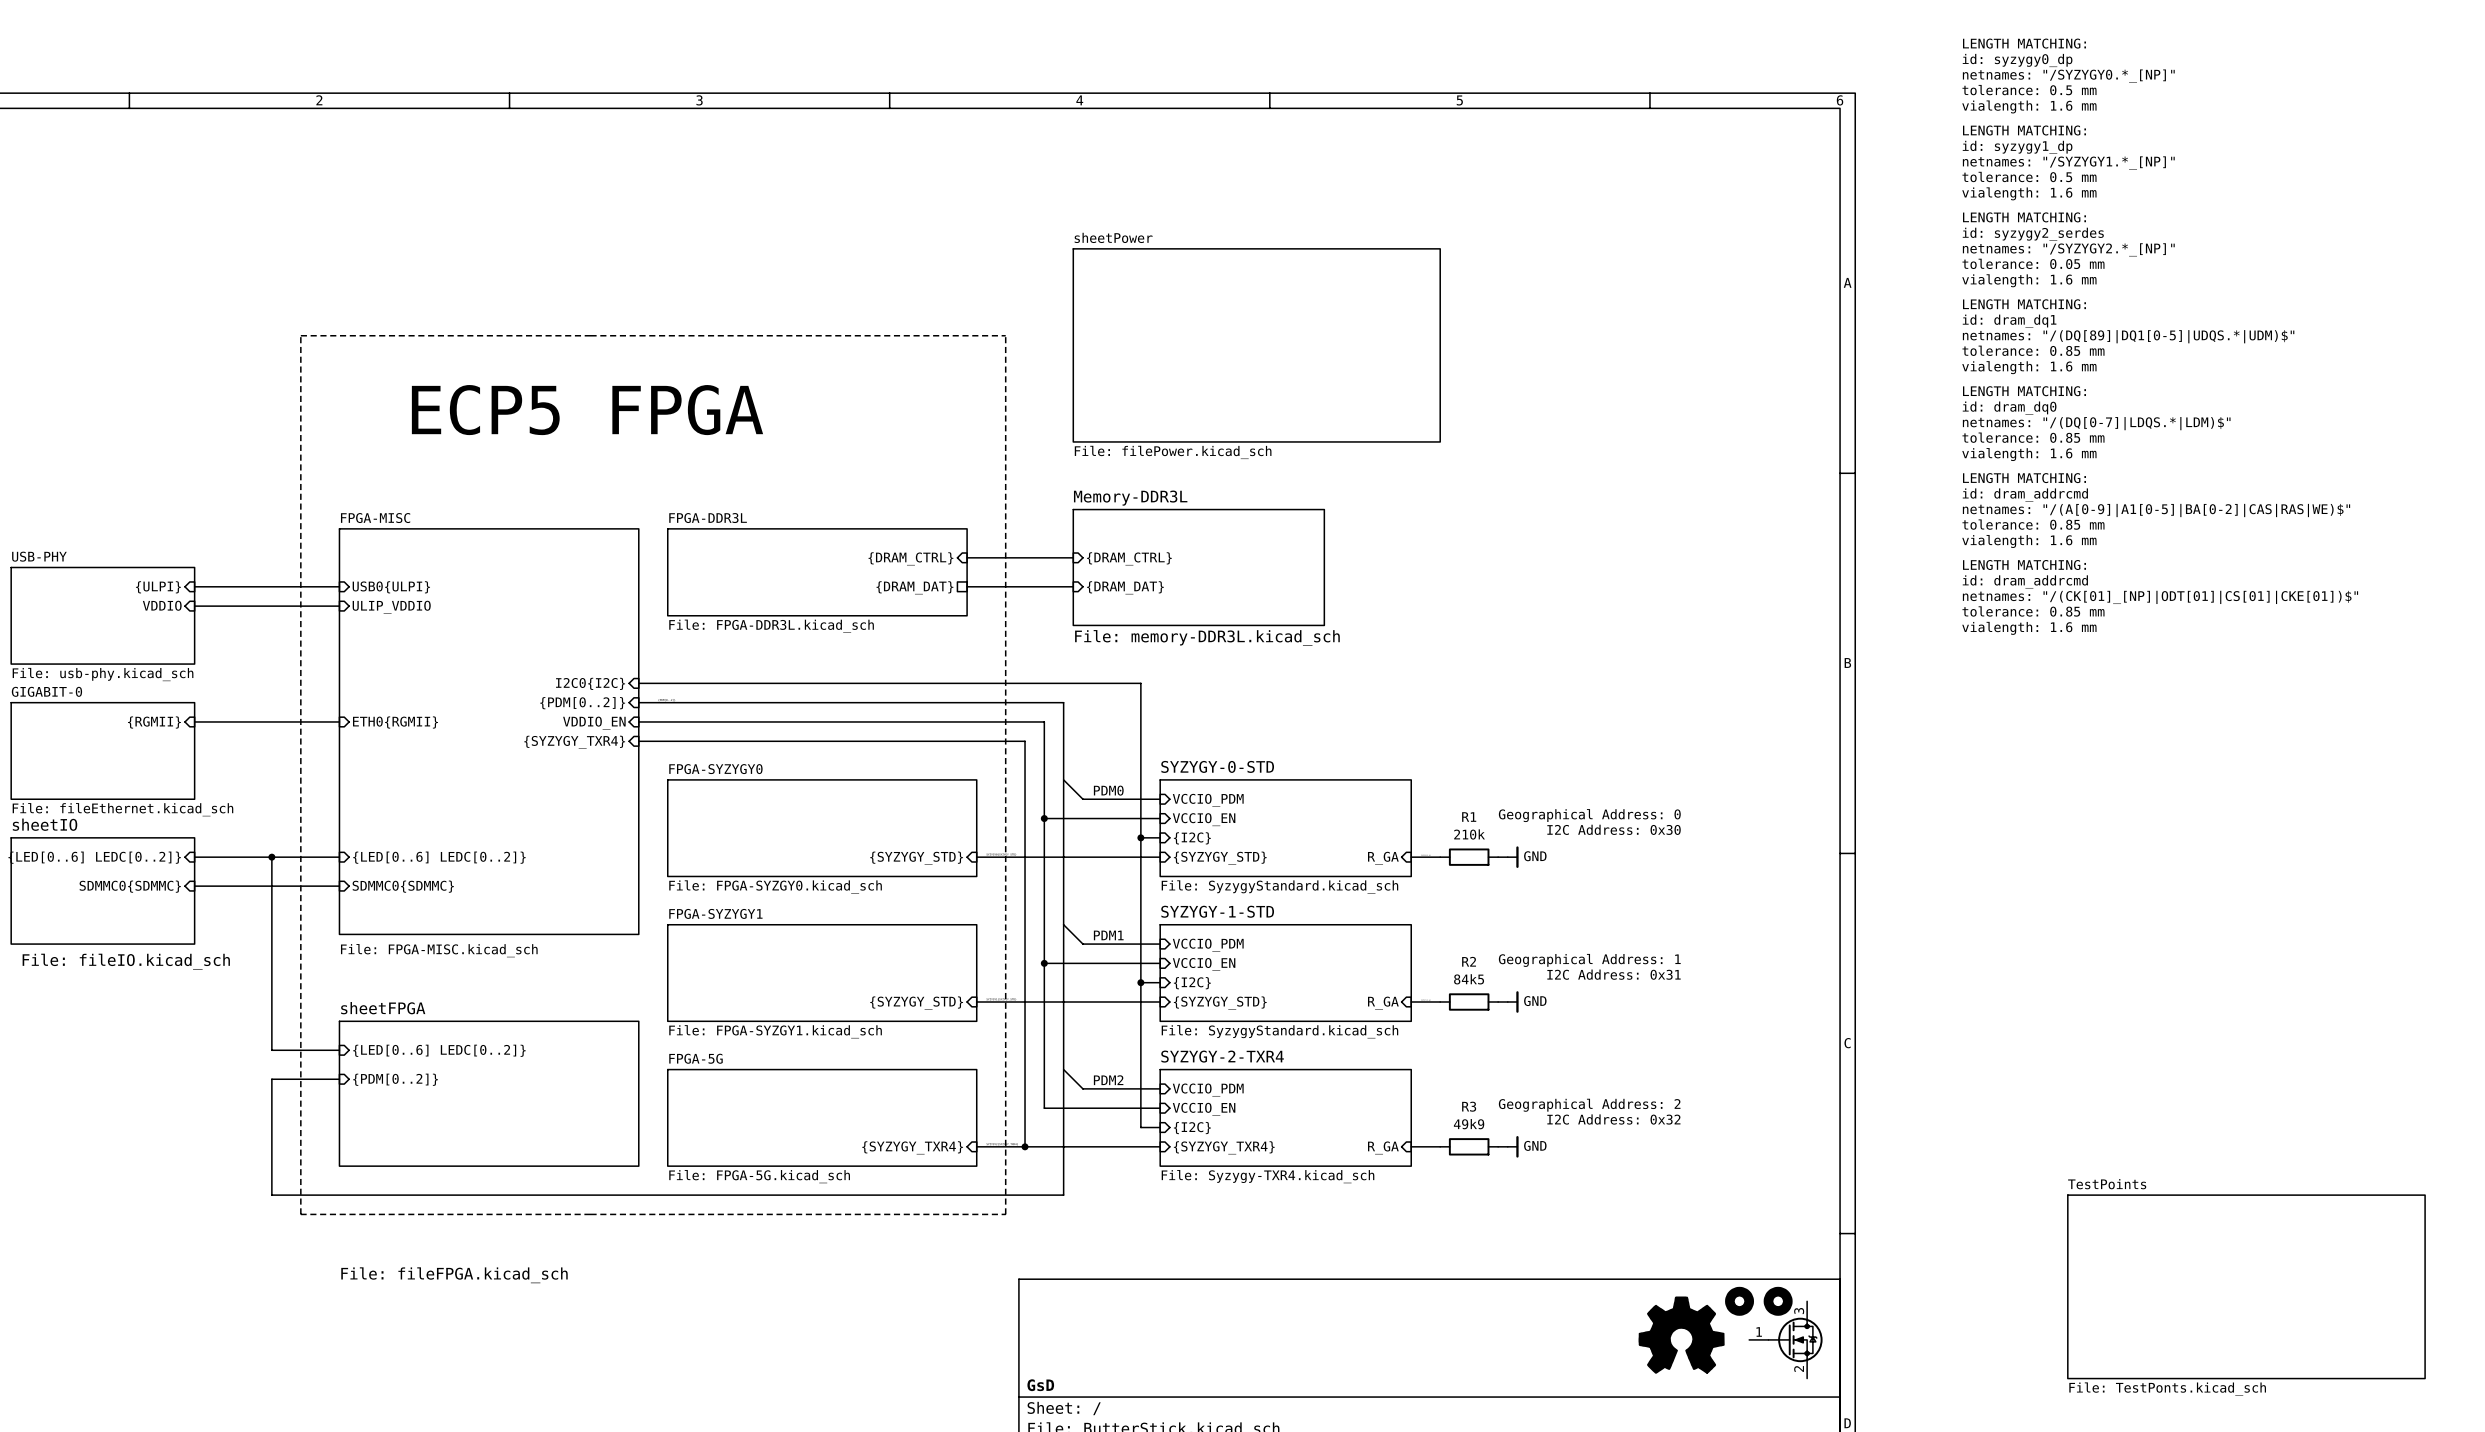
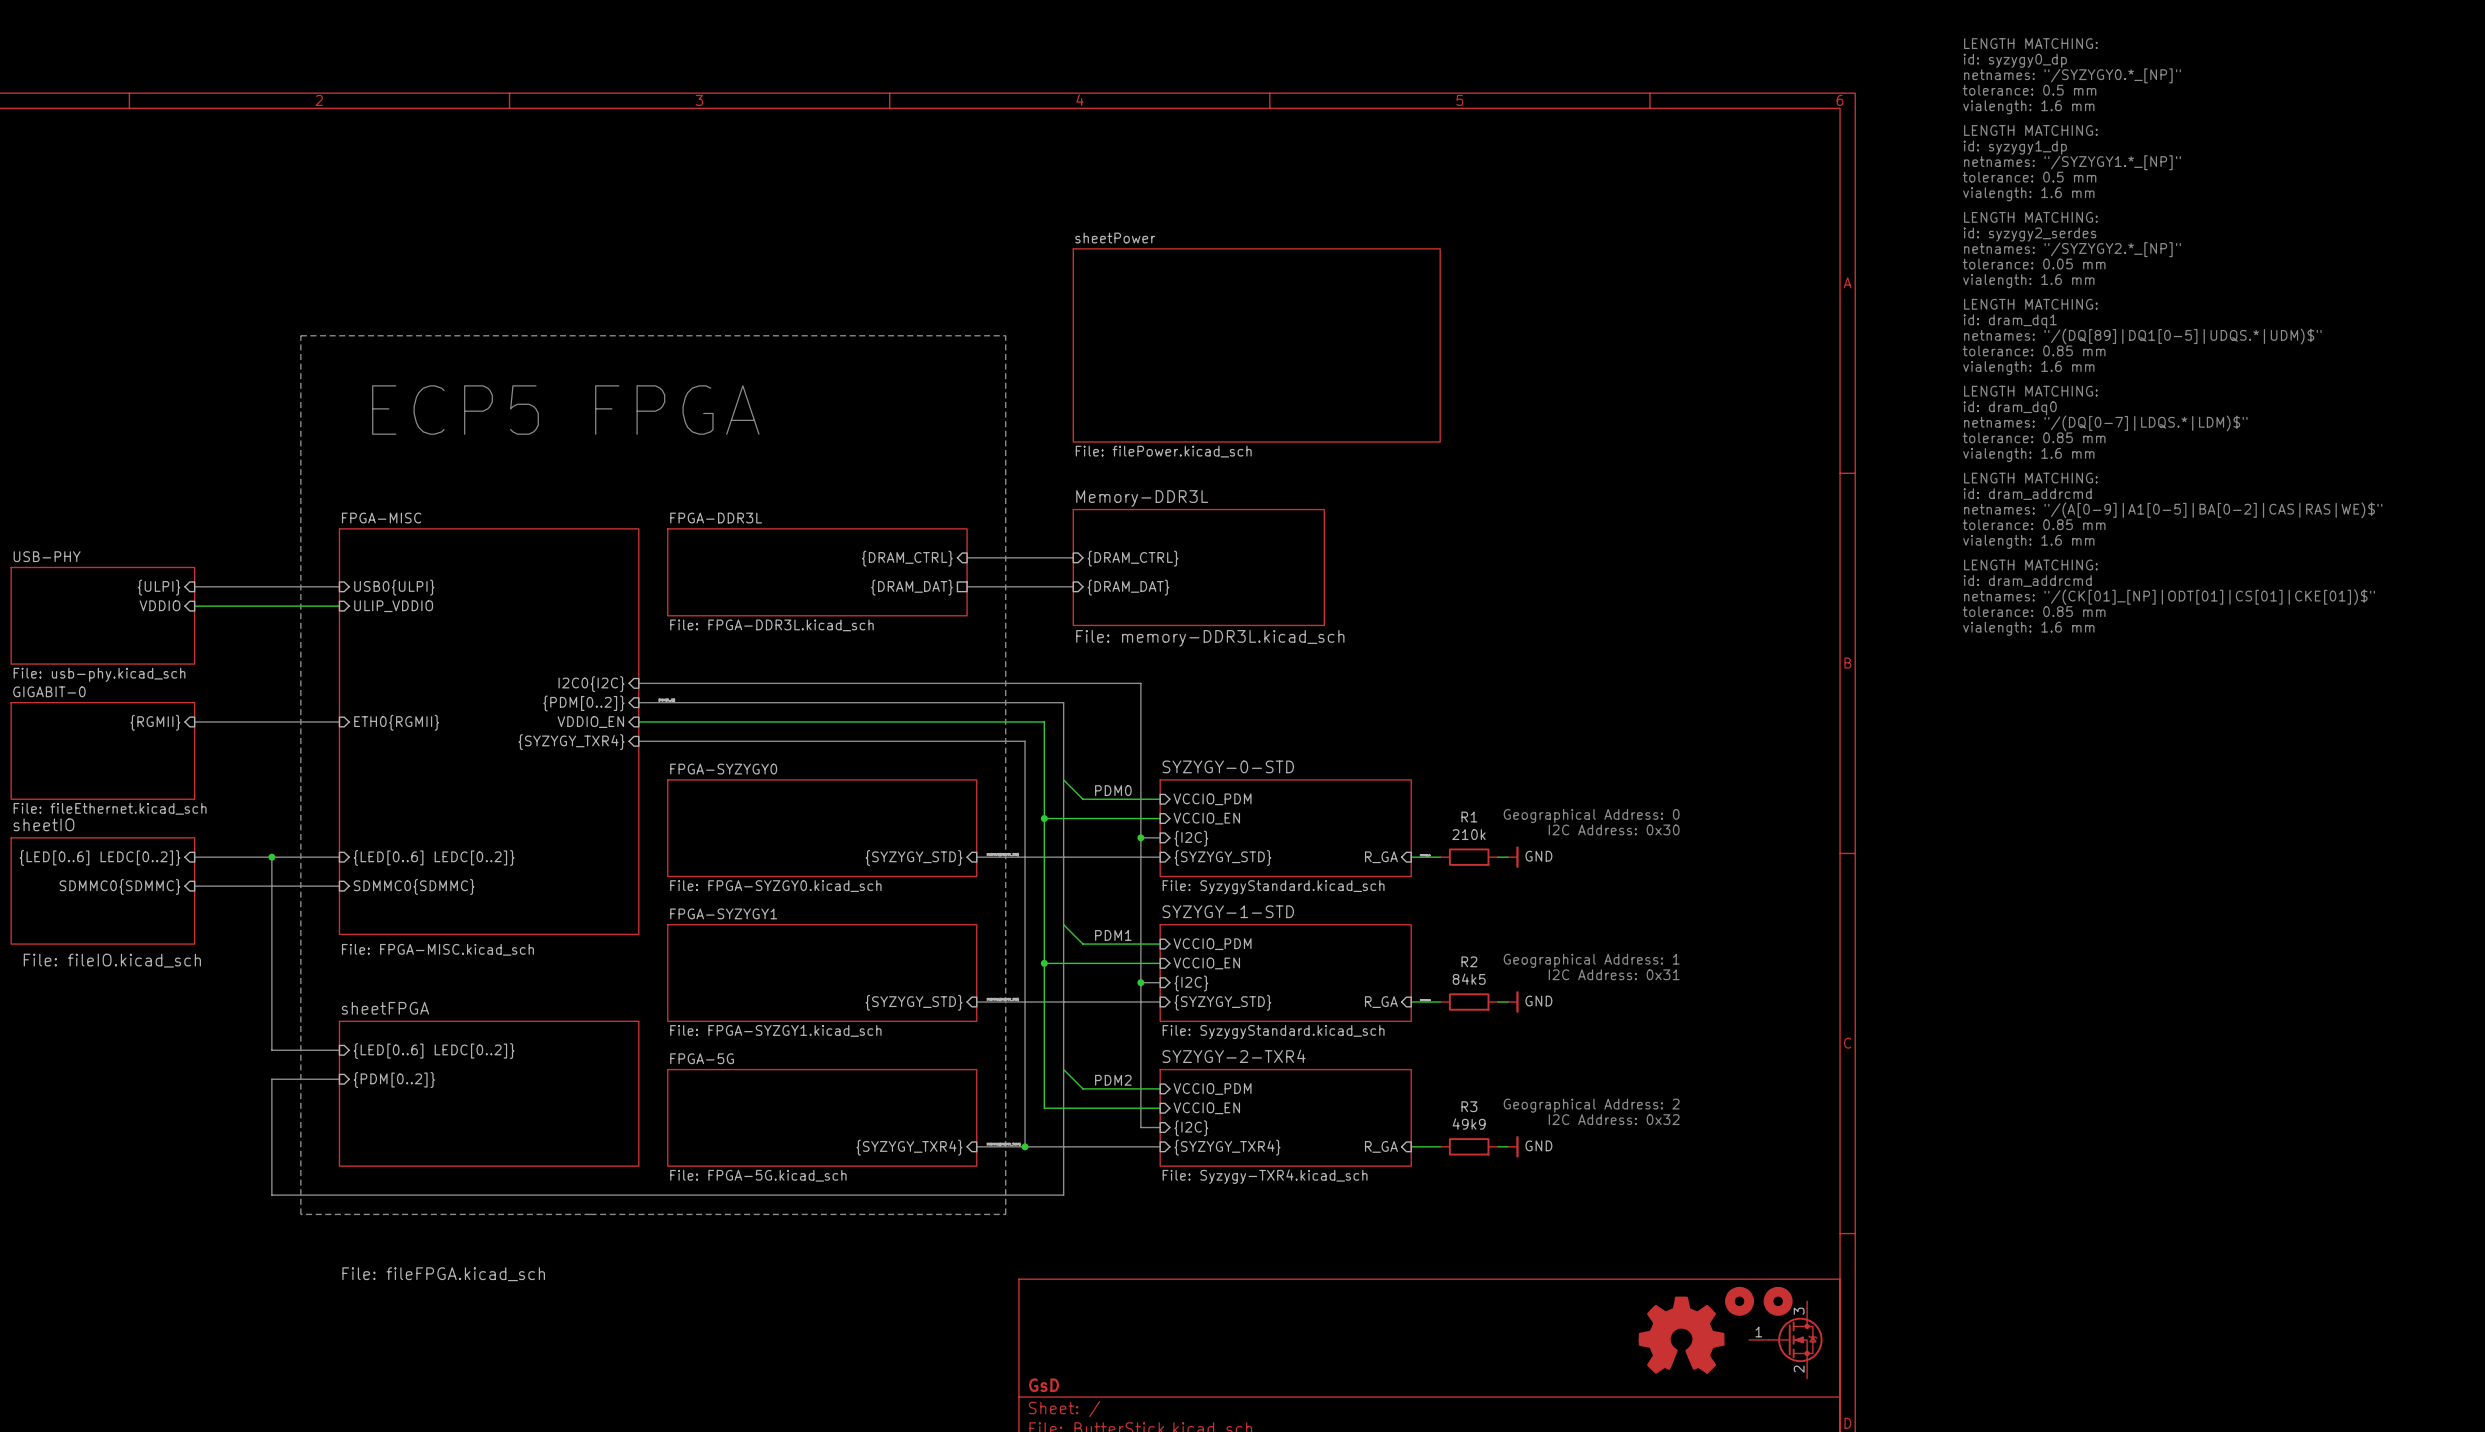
sheet TestPoints: File: TestPonts.kicad_sch (2246, 1286) -> none

